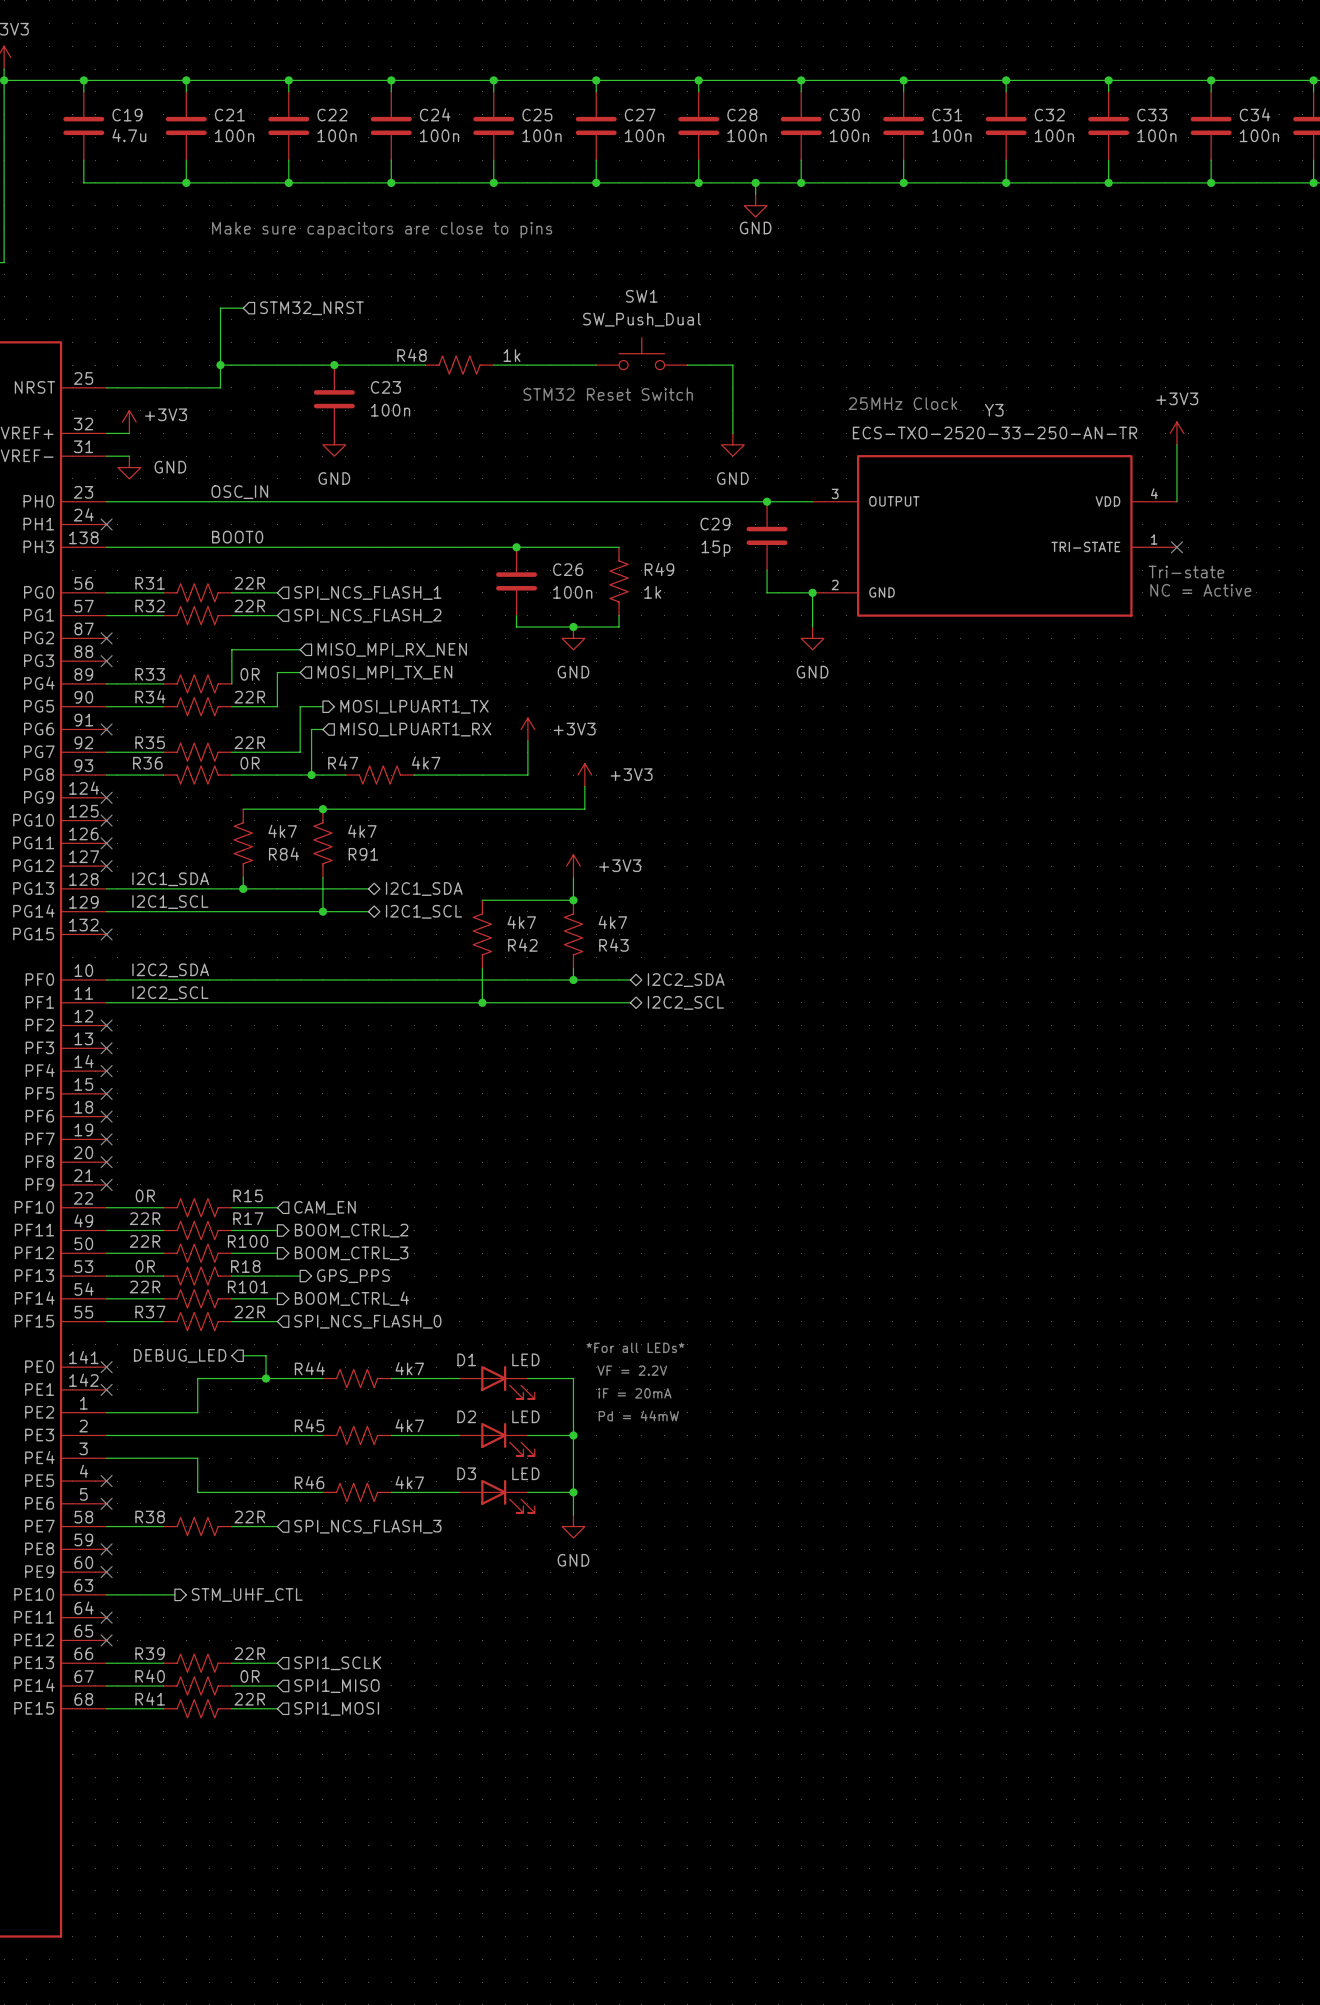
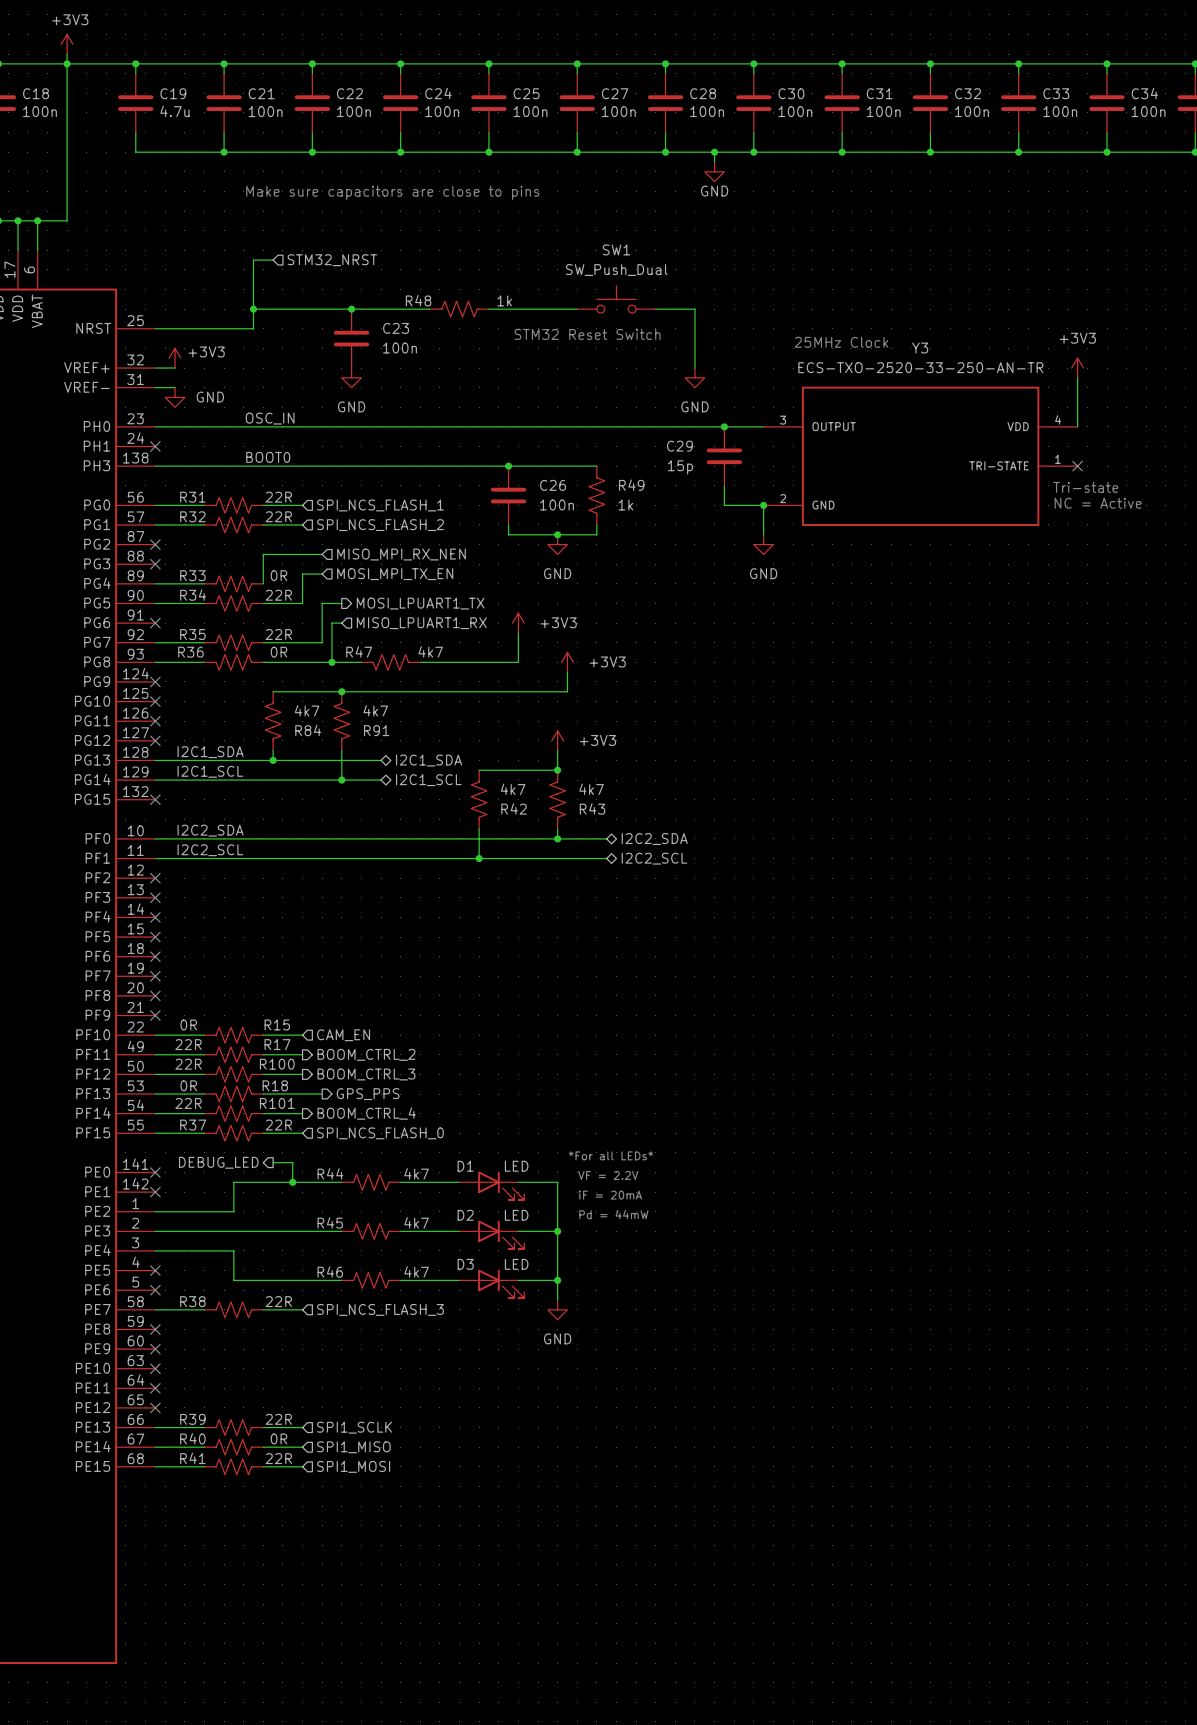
wire: (106, 1594) (174, 1594) -> none
no-connect mark: none -> (155, 1368)
hierarchical label: STM_UHF_CTL (247, 1595) -> none

